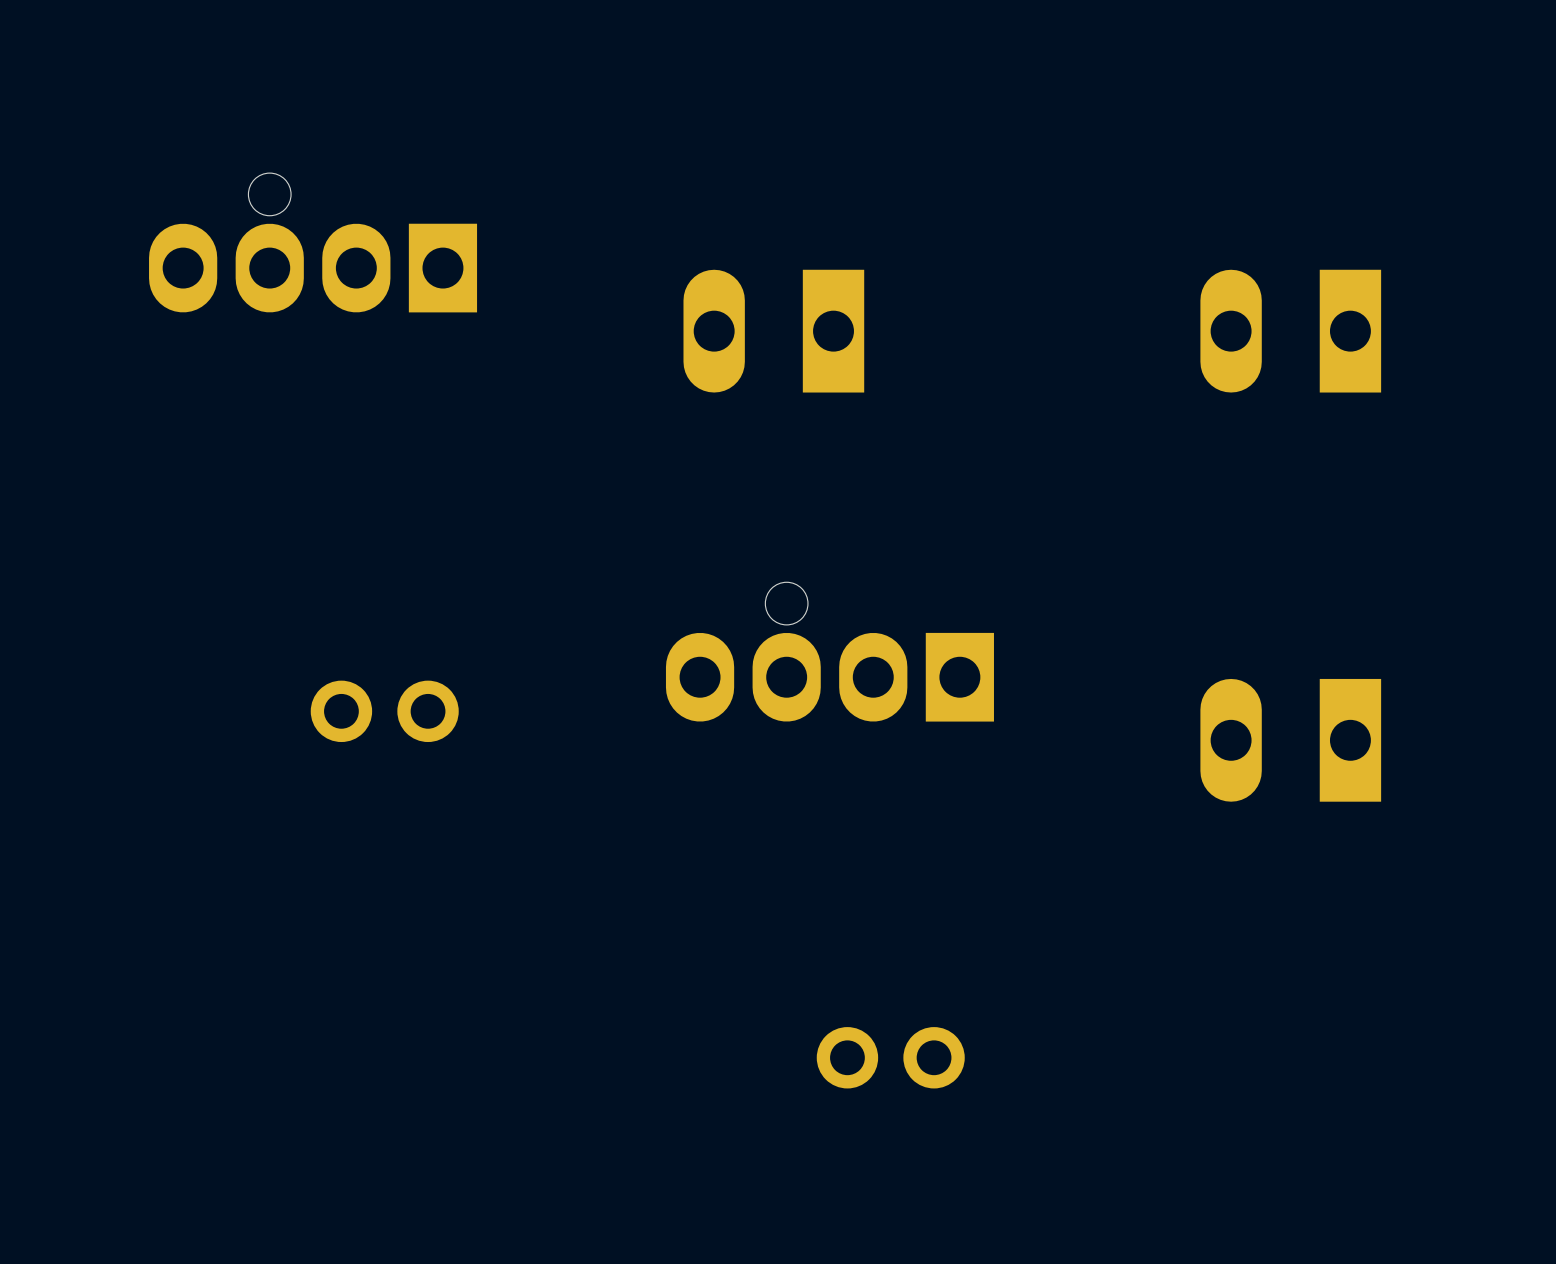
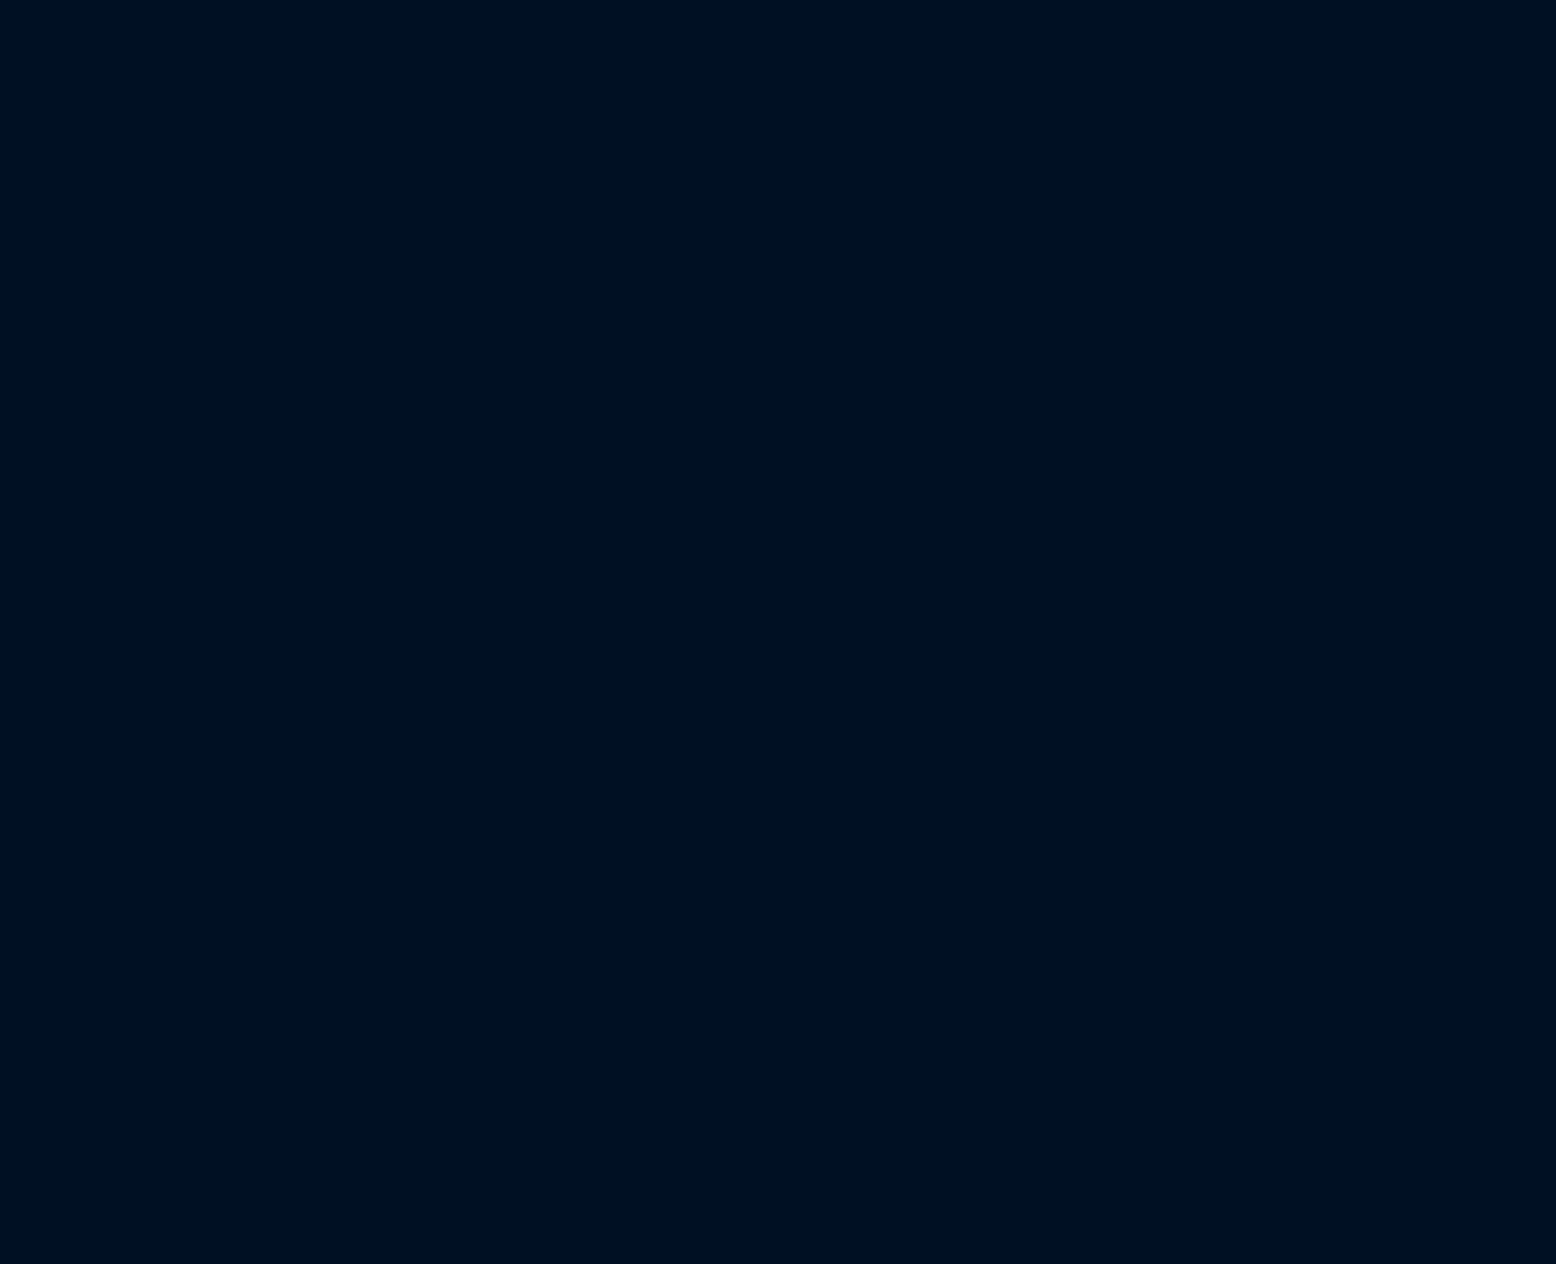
part: (313, 242) -> none
part: (773, 331) -> none
part: (1290, 331) -> none
part: (829, 651) -> none
part: (384, 711) -> none
part: (1290, 740) -> none
part: (890, 1057) -> none

